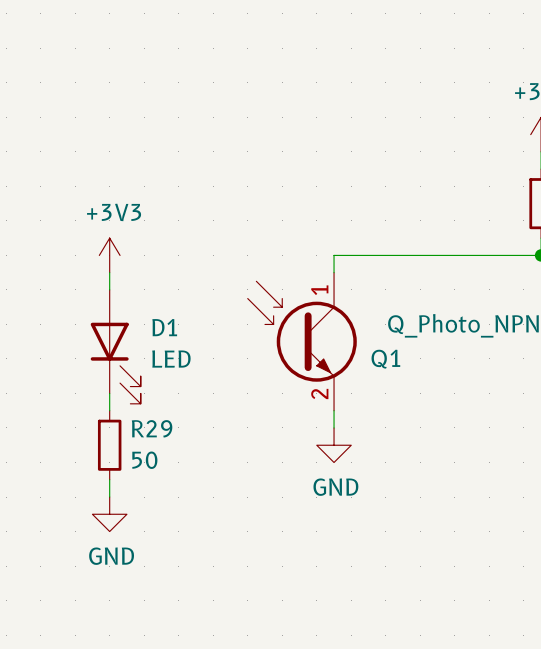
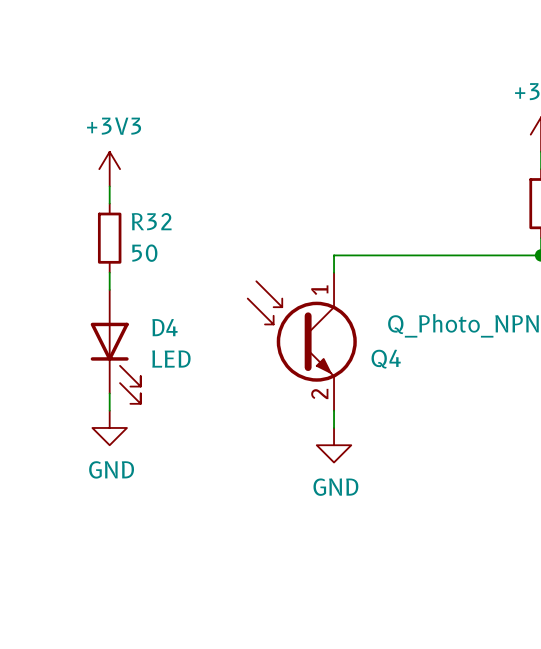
R32: none -> 50 (109, 238)
power symbol position: +3V3 (109, 255) -> +3V3 (109, 169)
D1 name: D1 (164, 327) -> D4 (165, 327)
Q1 name: Q1 (385, 359) -> Q4 (386, 359)
R29: 50 (109, 445) -> none
wire: (109, 479) (109, 497) -> (109, 186) (109, 203)
power symbol position: GND (109, 514) -> GND (109, 427)

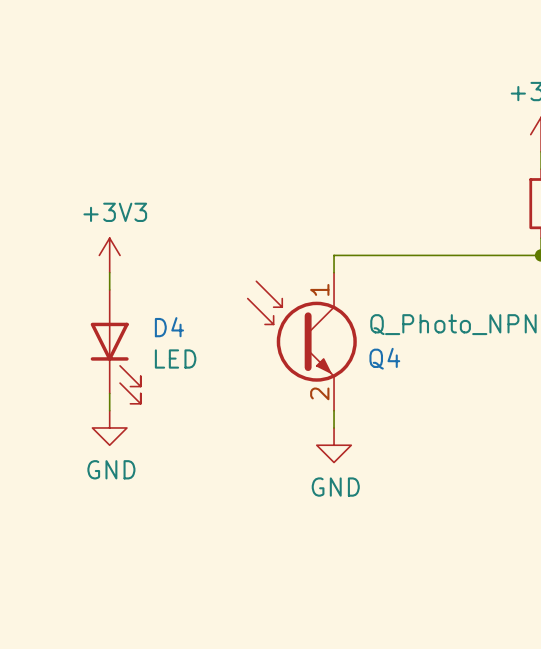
power symbol position: +3V3 (109, 169) -> +3V3 (109, 255)
wire: (109, 186) (109, 203) -> none
R32: 50 (109, 238) -> none

